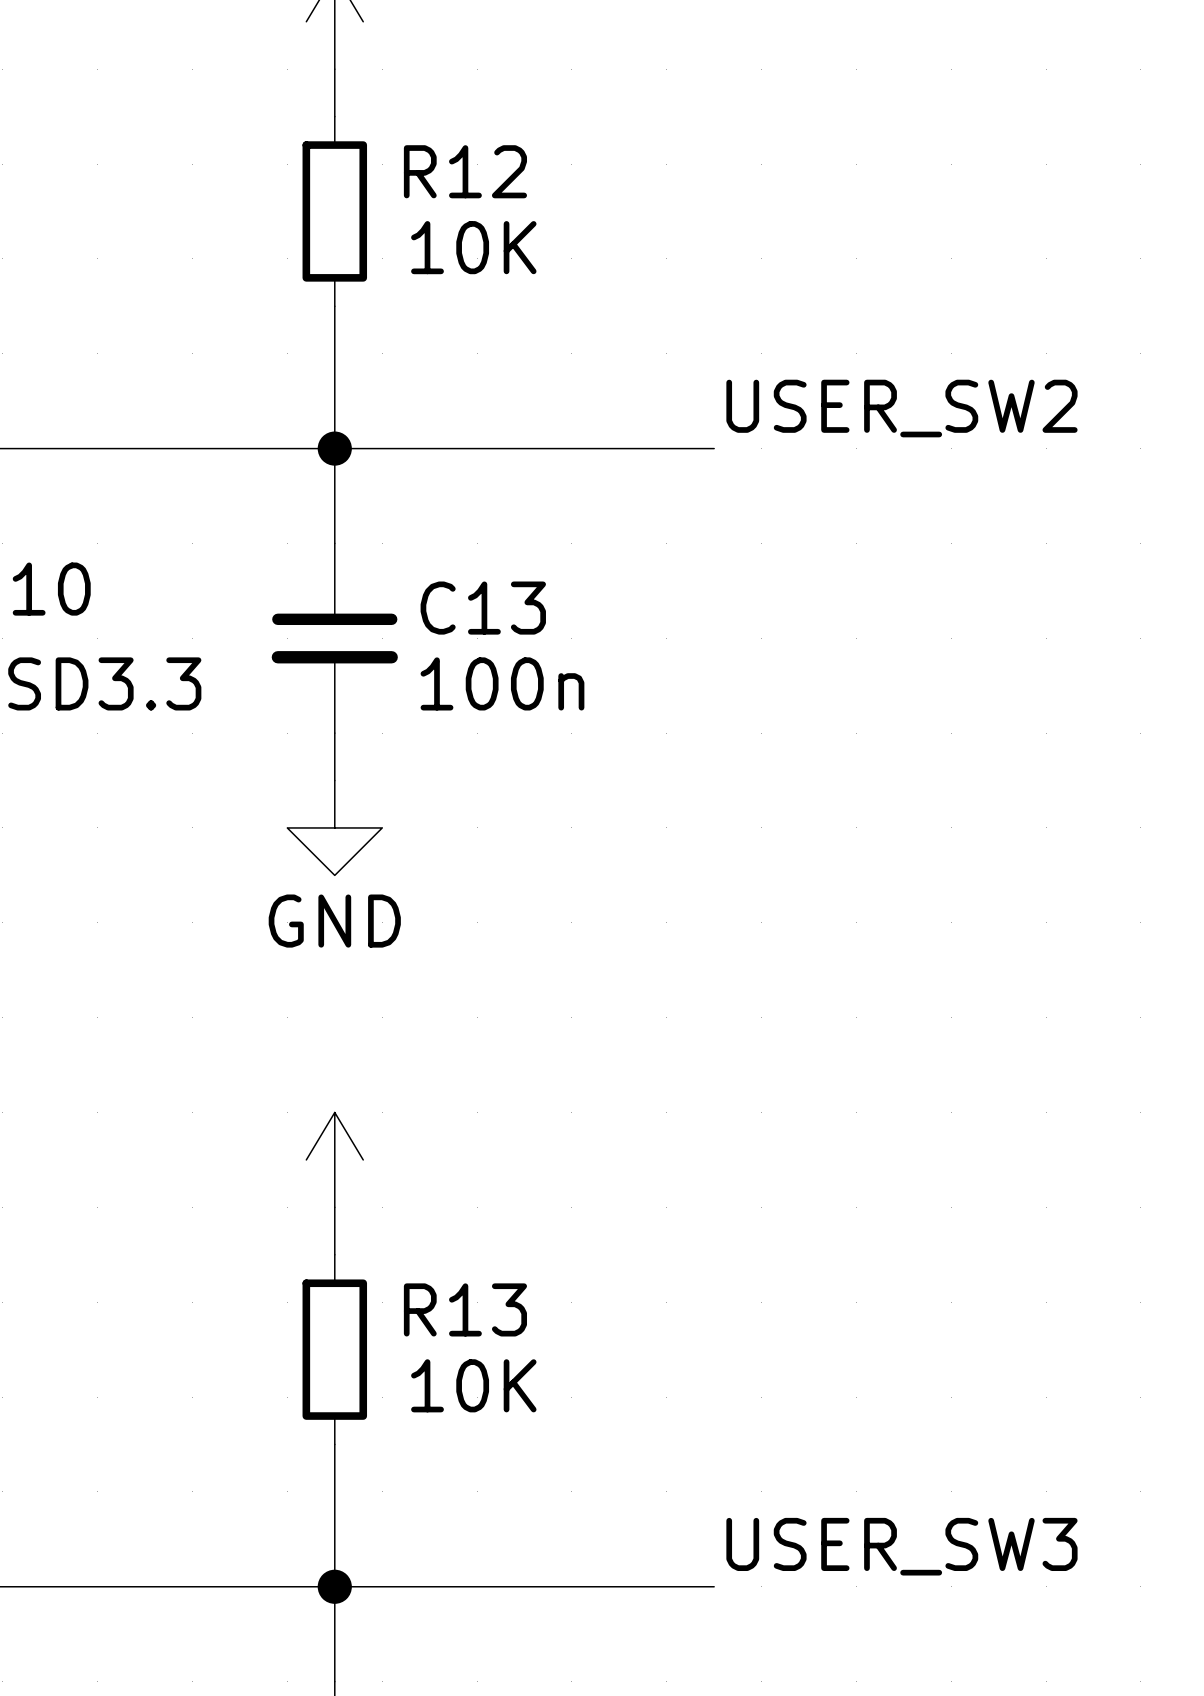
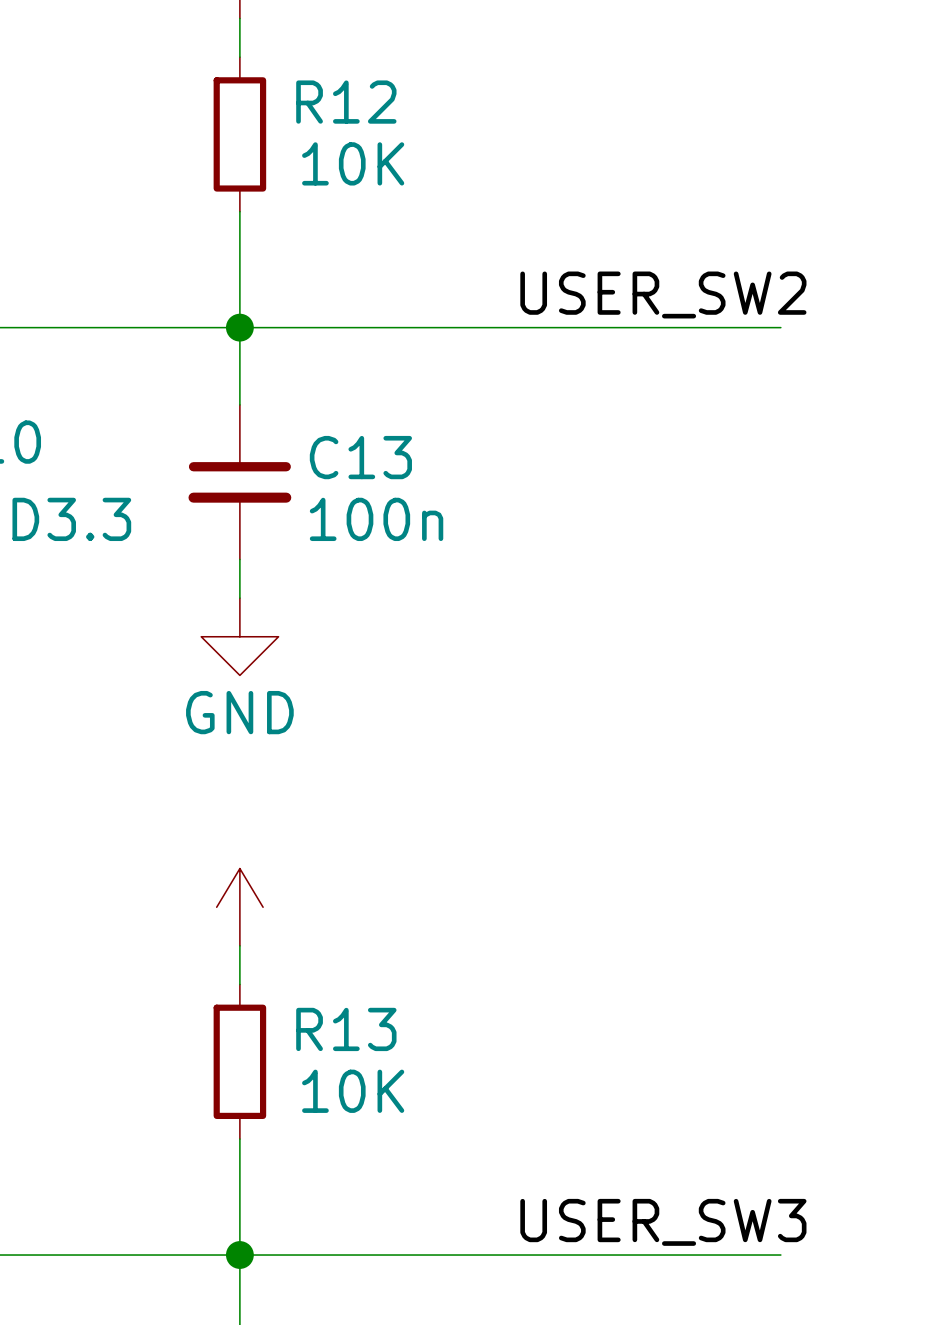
label position: USER_SW2 (901, 408) -> USER_SW2 (663, 294)
wire: none -> (549, 327) (780, 327)
label position: USER_SW3 (901, 1546) -> USER_SW3 (663, 1222)
wire: none -> (549, 1255) (780, 1255)

